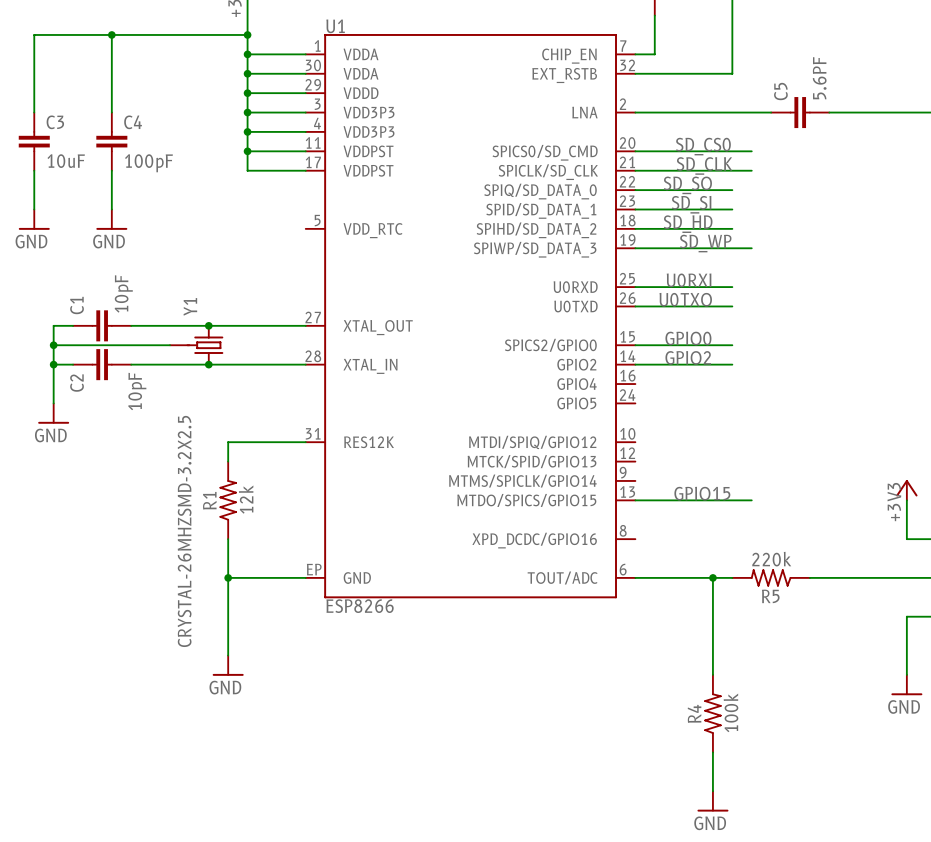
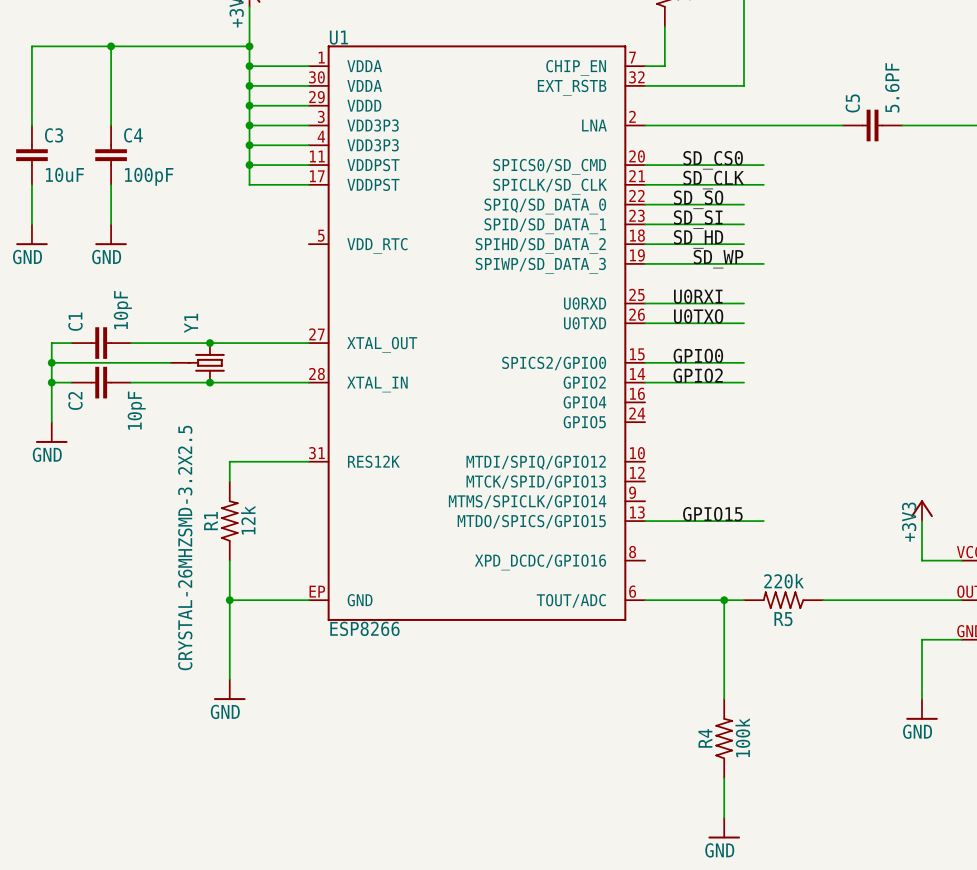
C5 position: (800, 112) -> (872, 125)

